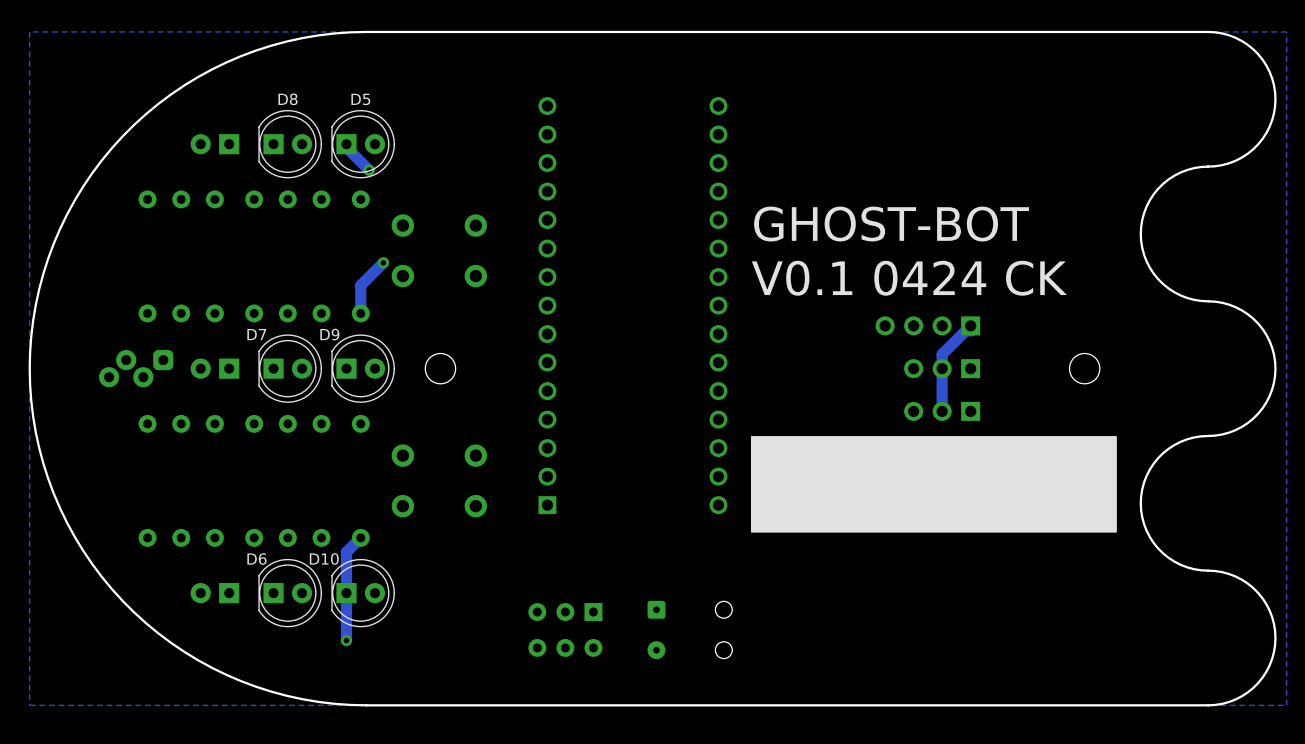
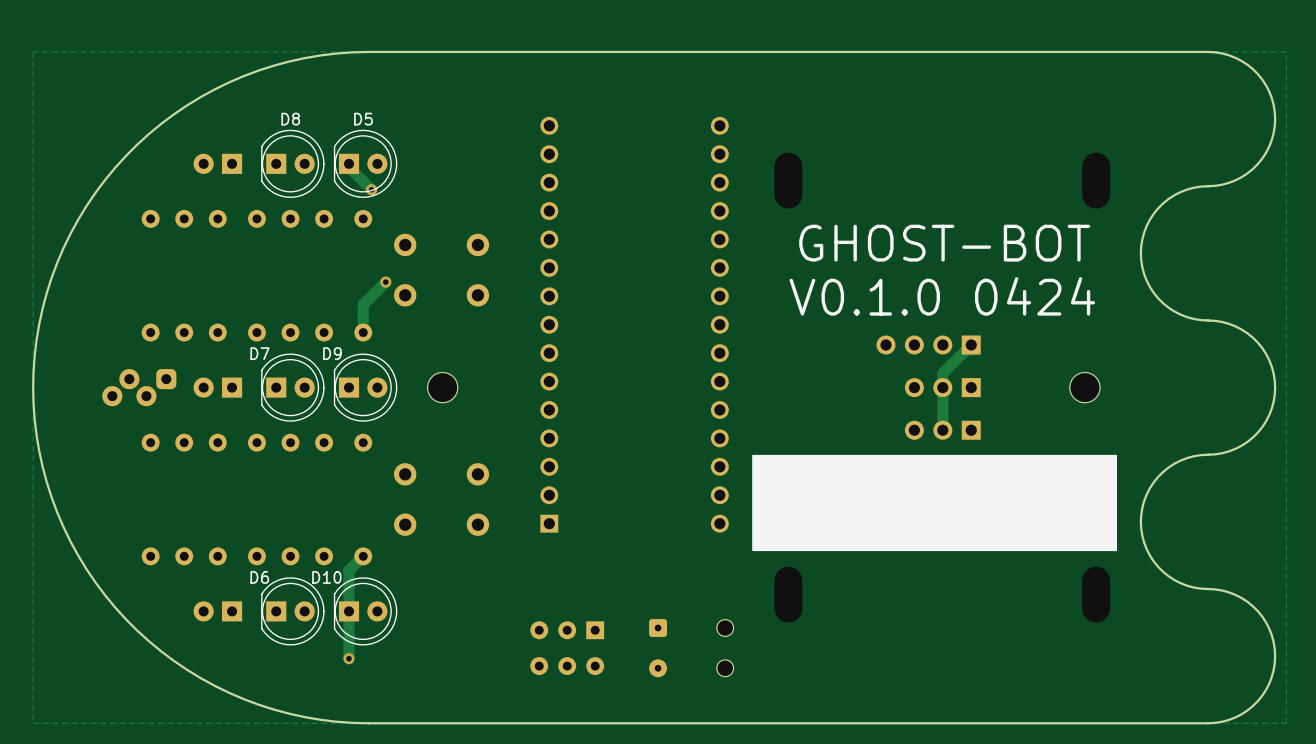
text position: GHOST-BOT (891, 224) -> GHOST-BOT (944, 243)
text: V0.1 0424 CK (909, 278) -> V0.1.0 0424 (942, 296)

